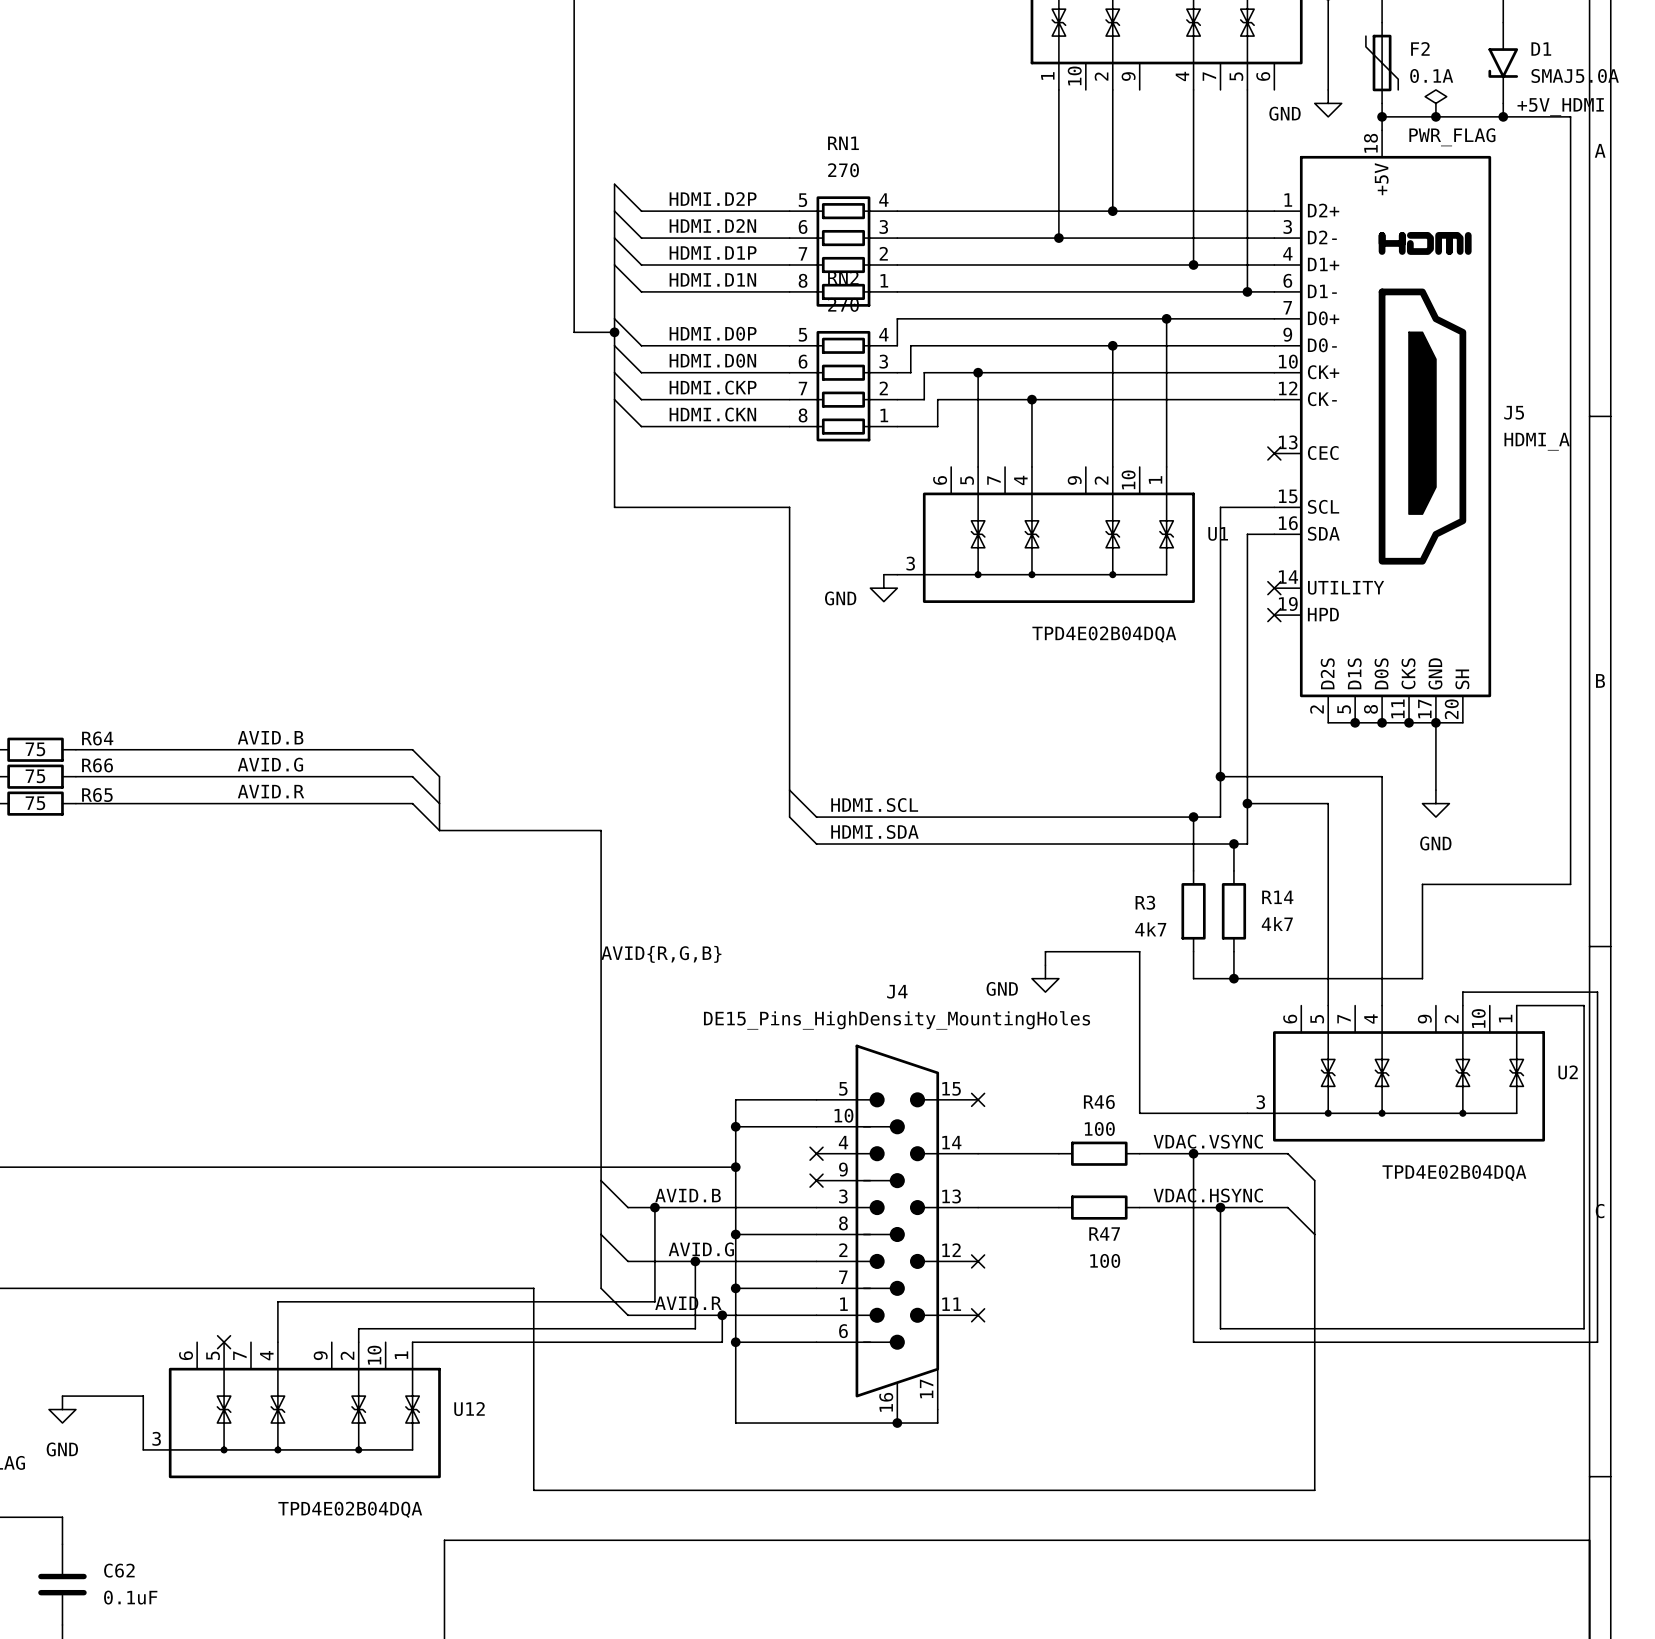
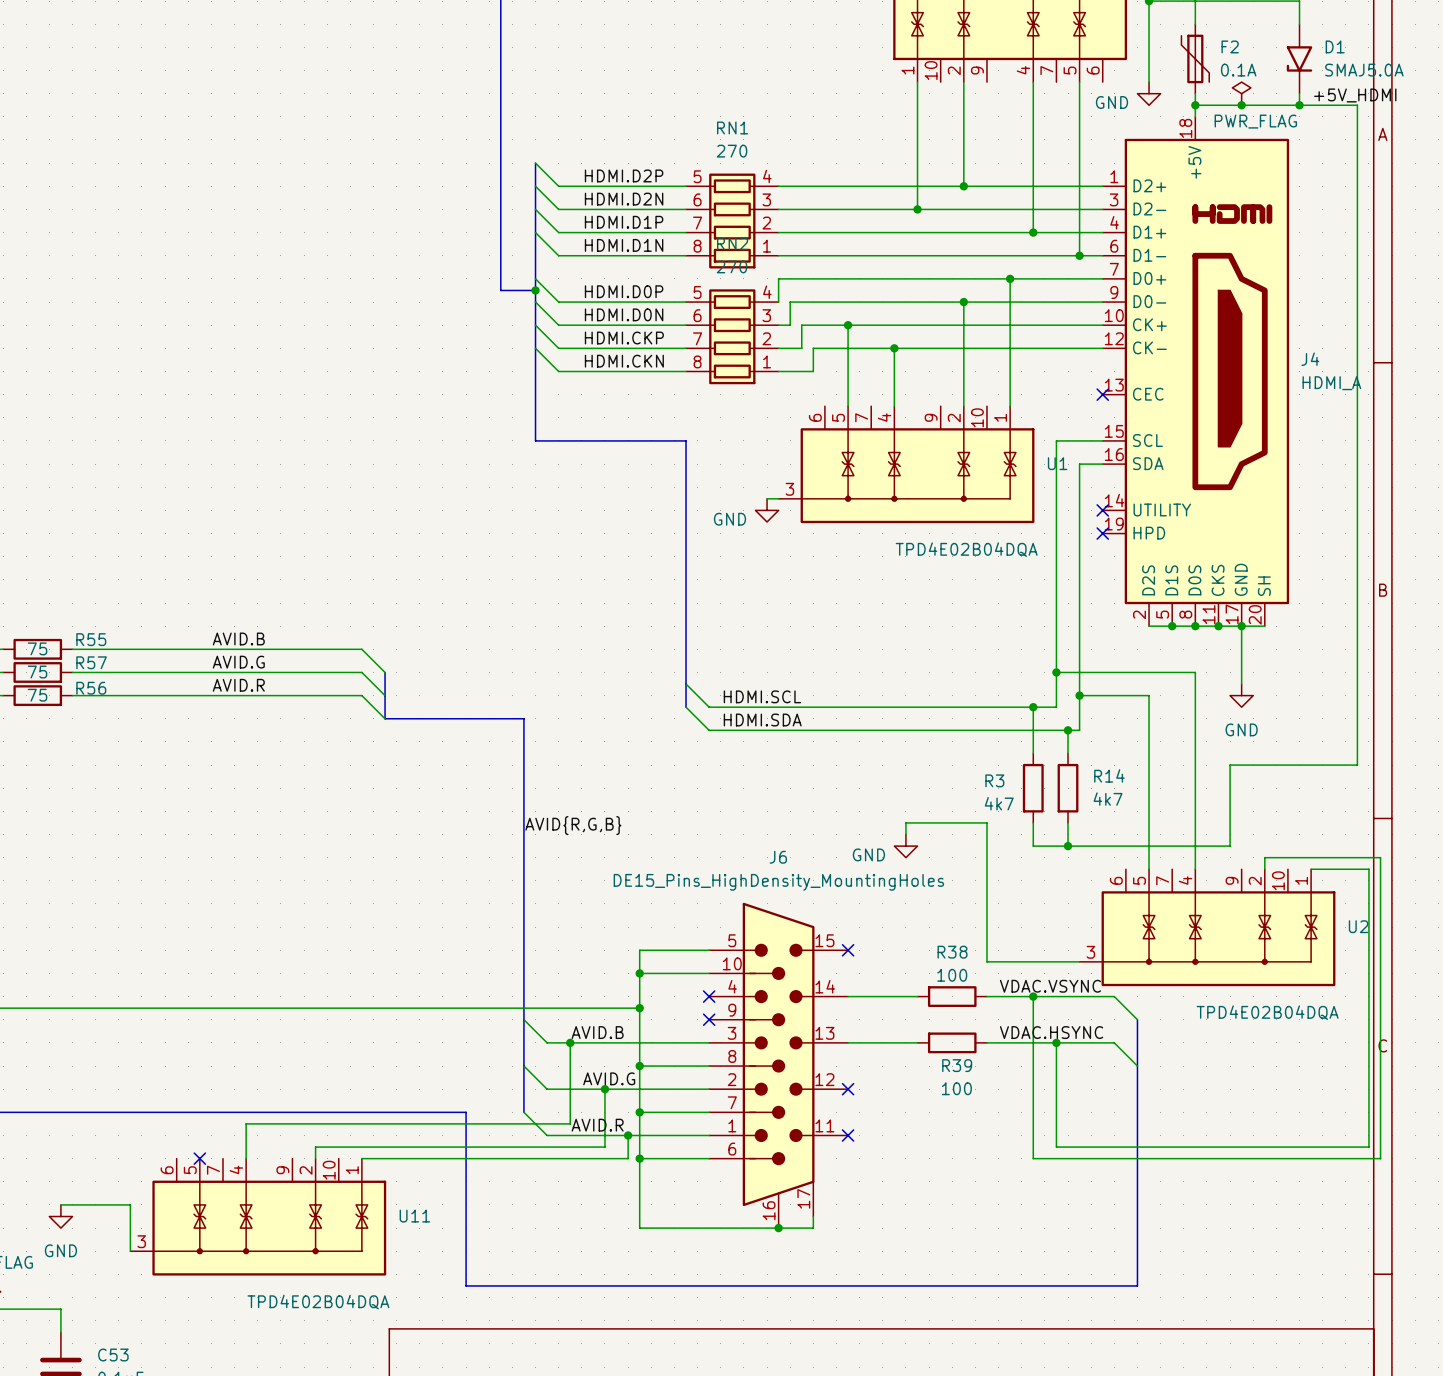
J5 name: J5 (1514, 412) -> J4 (1310, 359)
R64 name: R64 (97, 738) -> R55 (91, 639)
R66 name: R66 (97, 765) -> R57 (91, 662)
R65 name: R65 (97, 795) -> R56 (91, 688)
J4 name: J4 (897, 991) -> J6 (778, 857)
R46 name: R46 (1099, 1102) -> R38 (952, 952)
R47 name: R47 (1104, 1233) -> R39 (957, 1065)
U12 name: U12 (469, 1409) -> U11 (414, 1216)
C62 name: C62 (119, 1570) -> C53 (113, 1354)

